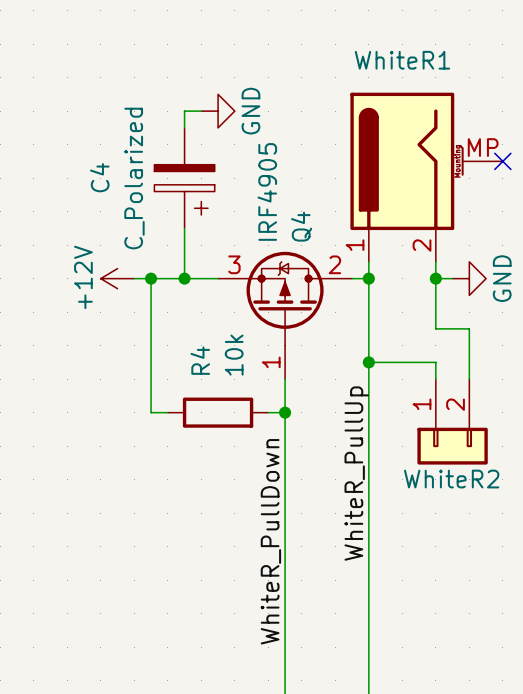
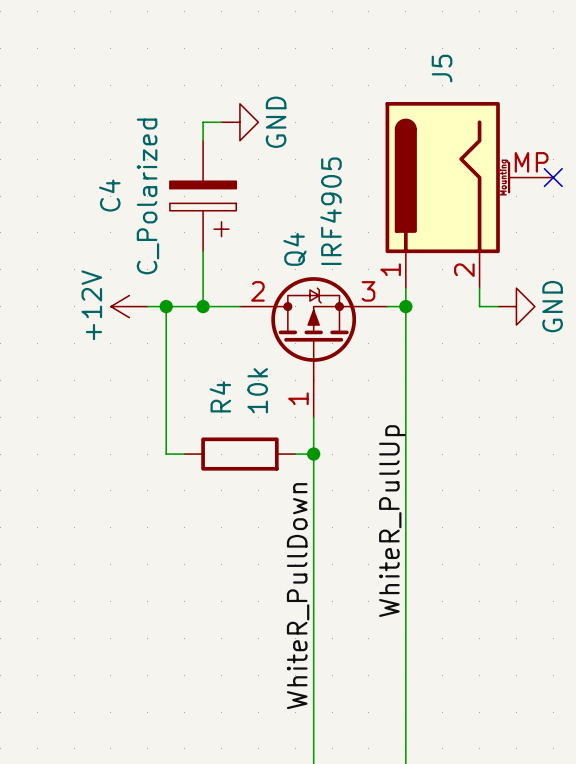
WhiteR1 name: WhiteR1 (402, 60) -> J5 (442, 68)
wire: (435, 278) (435, 328) (469, 328) (469, 379) -> none
junction: (435, 278) -> none
Q4 flip: as is (285, 298) -> left-right (313, 328)
wire: (368, 362) (435, 362) (435, 379) -> none
junction: (368, 362) -> none
WhiteR2: (452, 421) -> none

